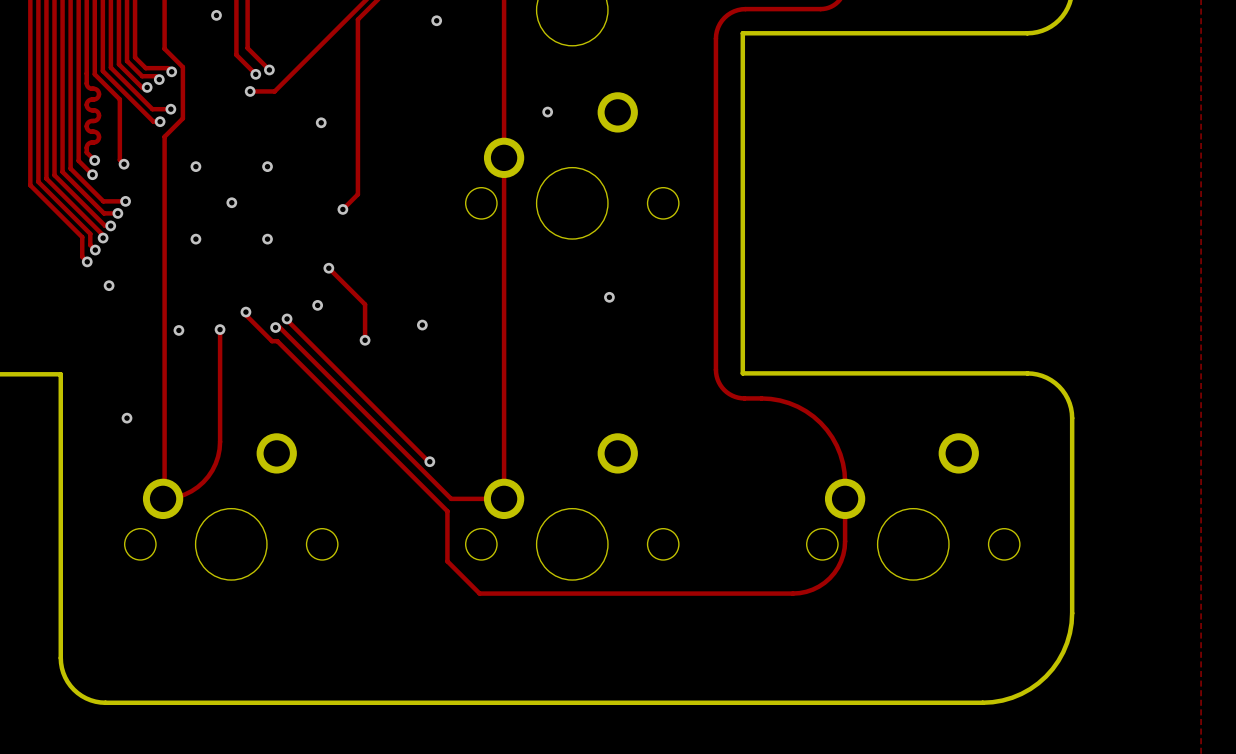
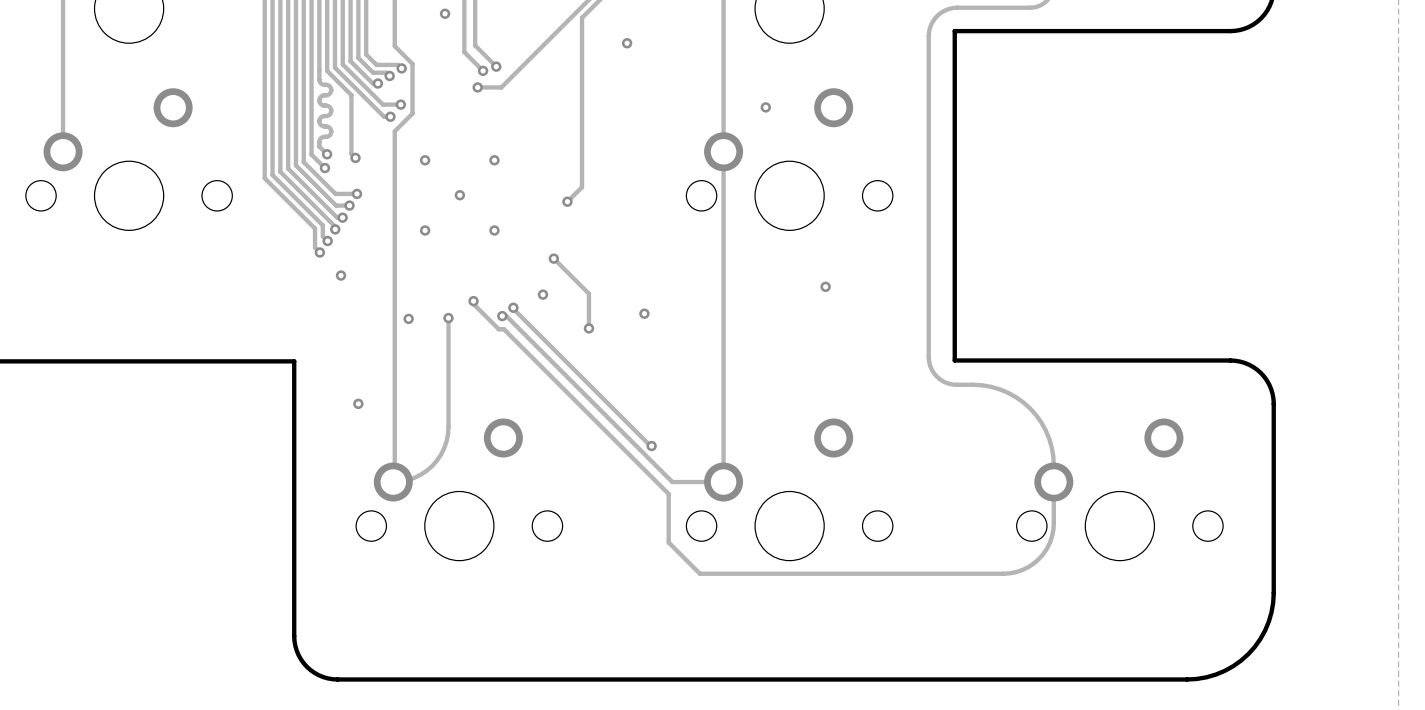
via position: (436, 20) -> (627, 43)
via: (321, 122) -> none

